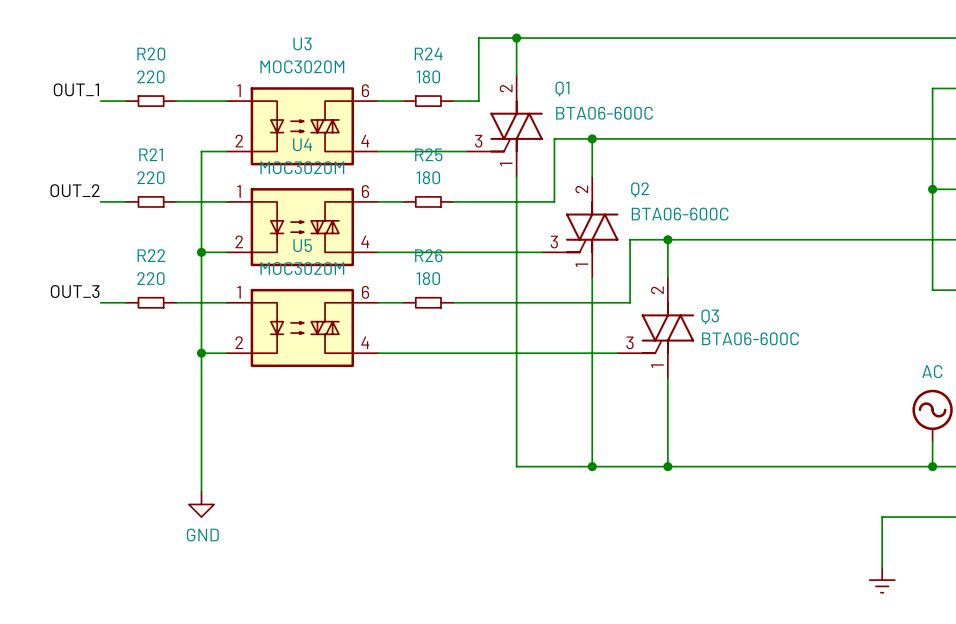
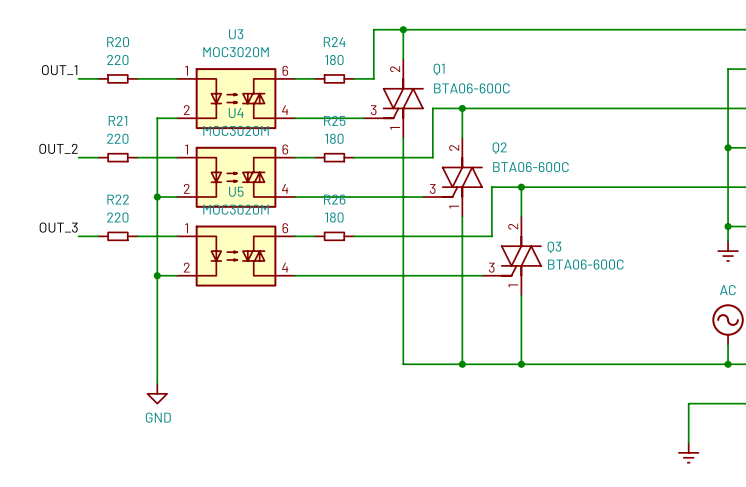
wire: none -> (728, 226) (728, 241)
junction: none -> (728, 226)
power symbol: none -> (728, 251)

